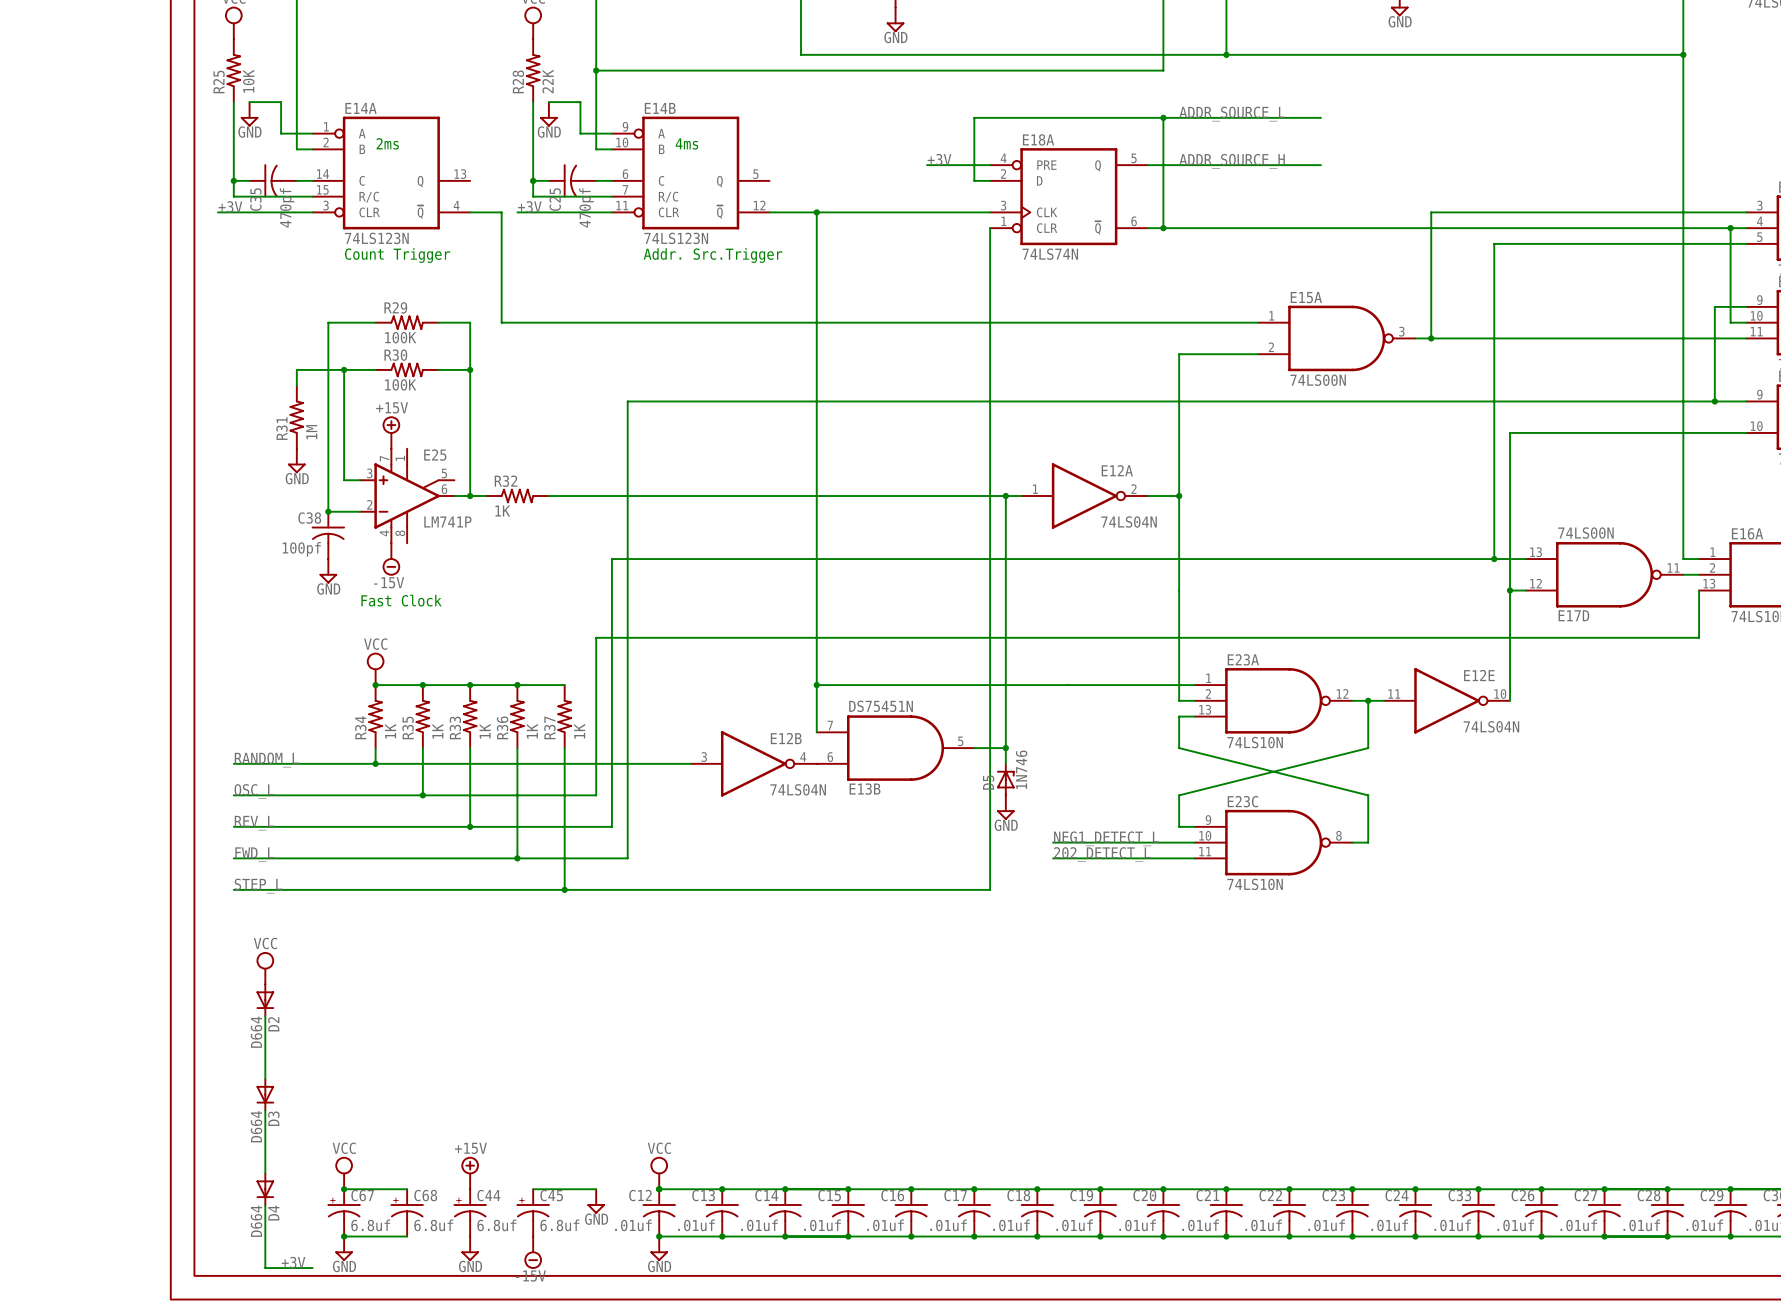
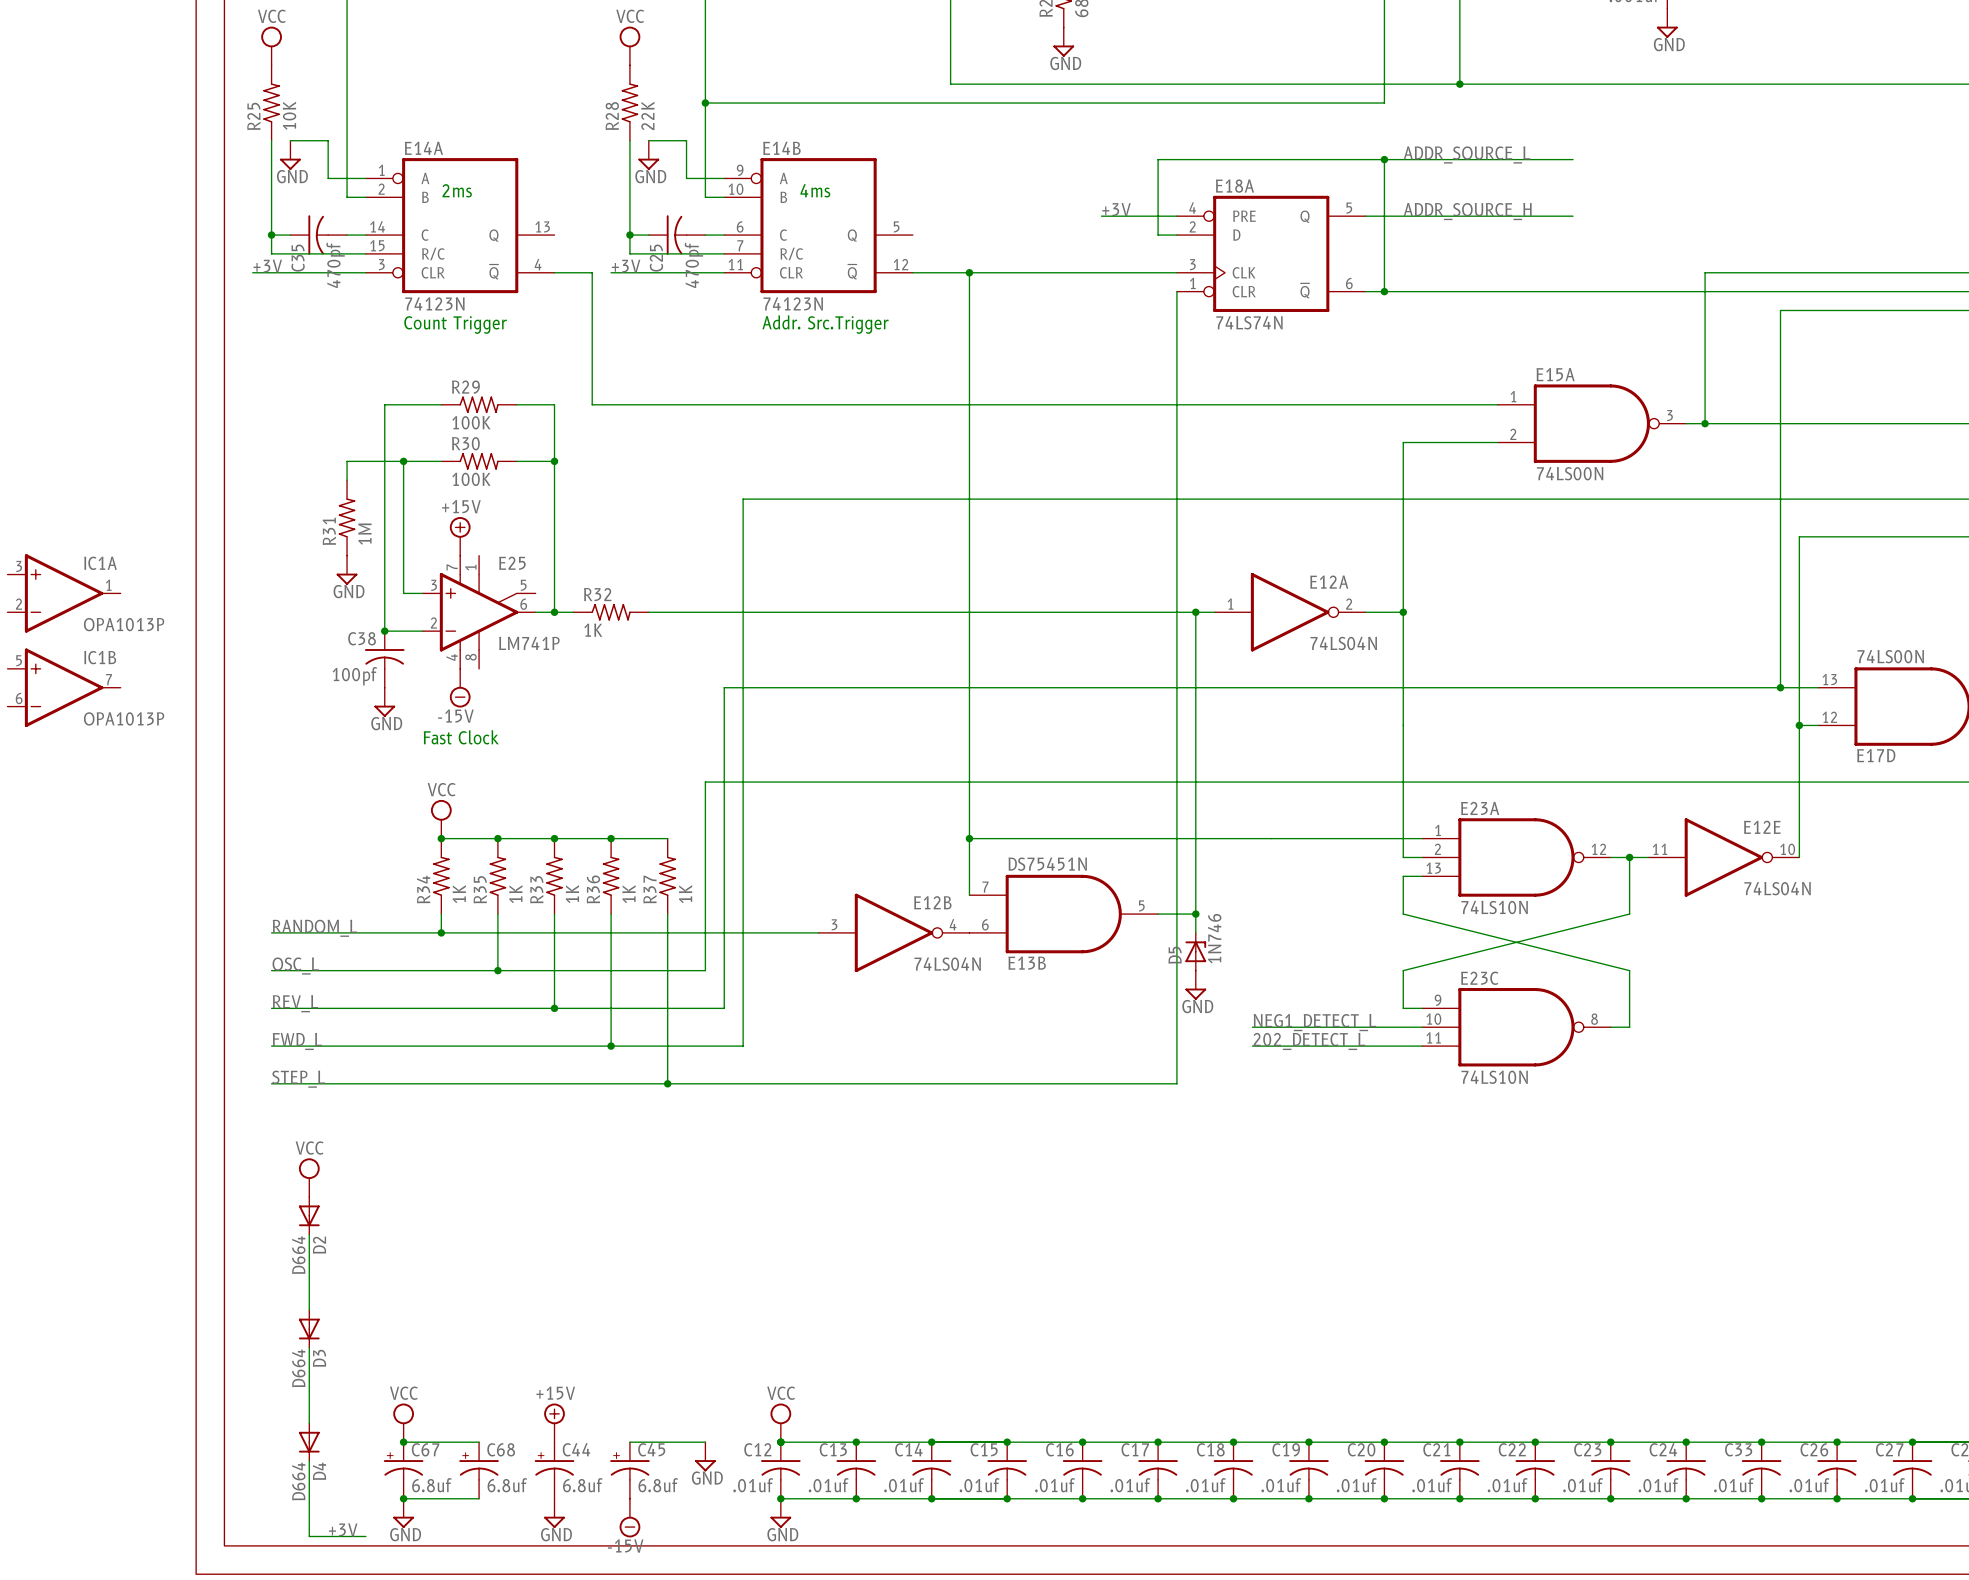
E14A value: 74LS123N (376, 238) -> 74123N (434, 303)
E14B value: 74LS123N (676, 238) -> 74123N (793, 303)
IC1A: none -> OPA1013P (64, 593)
IC1B: none -> OPA1013P (64, 687)

